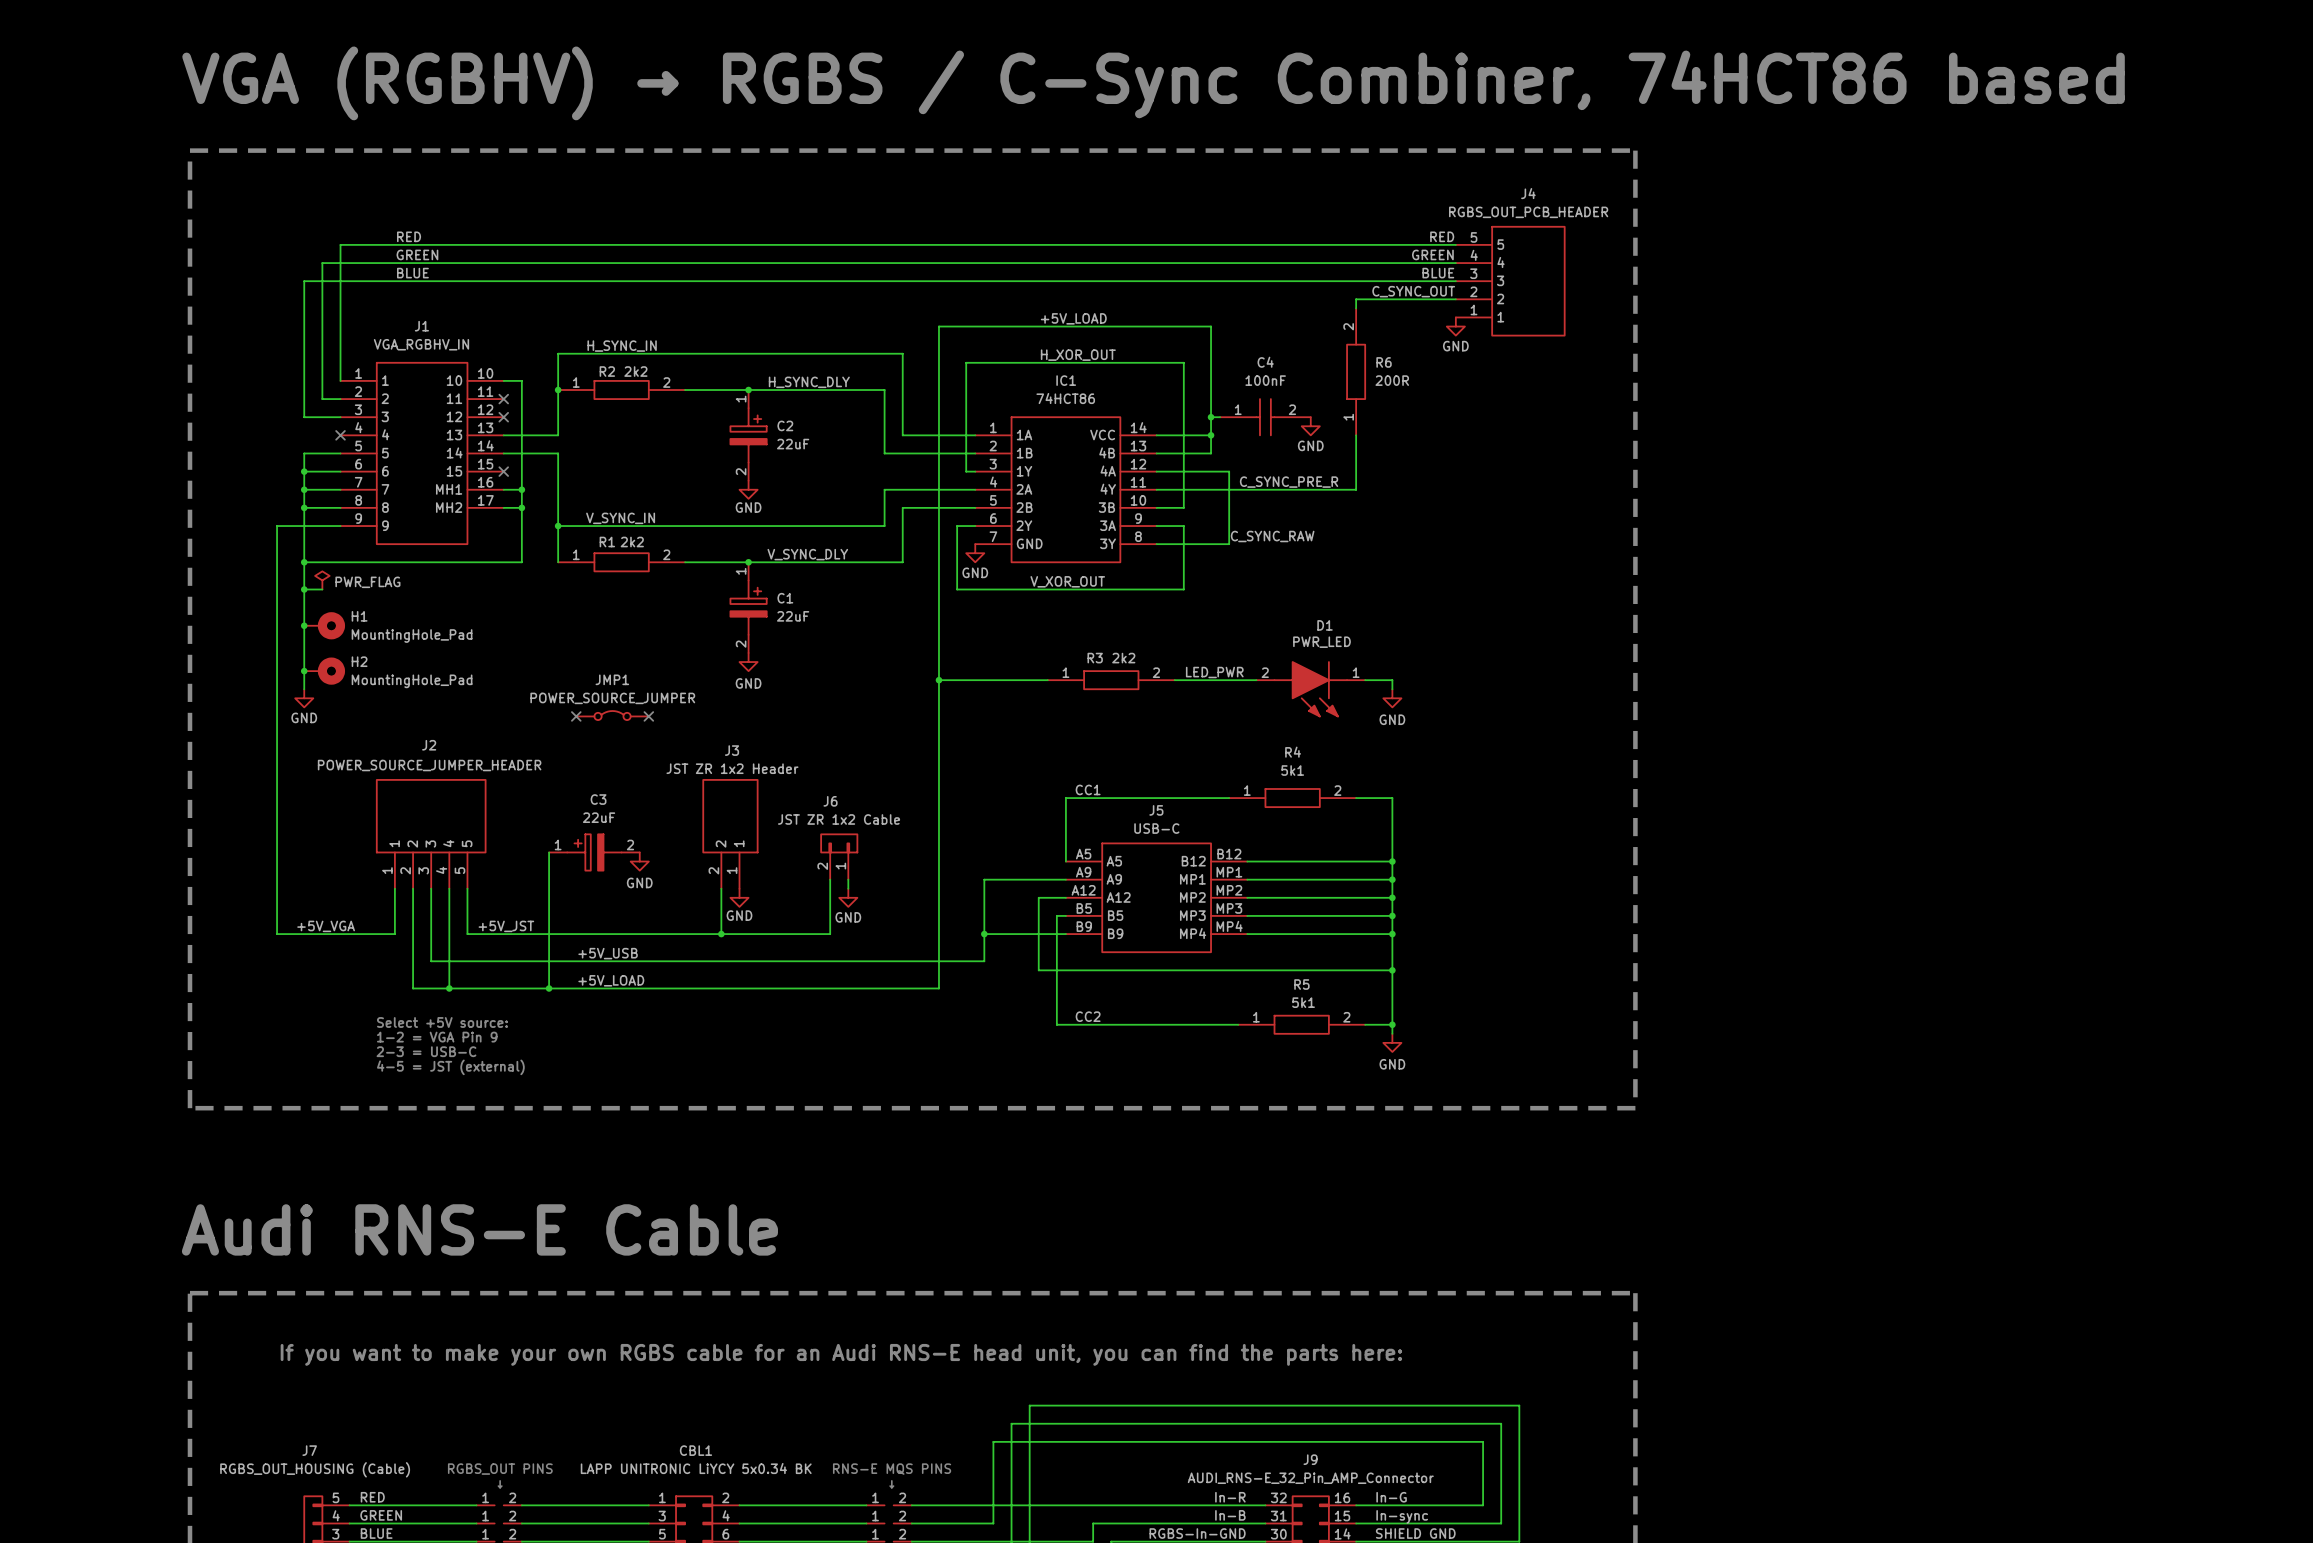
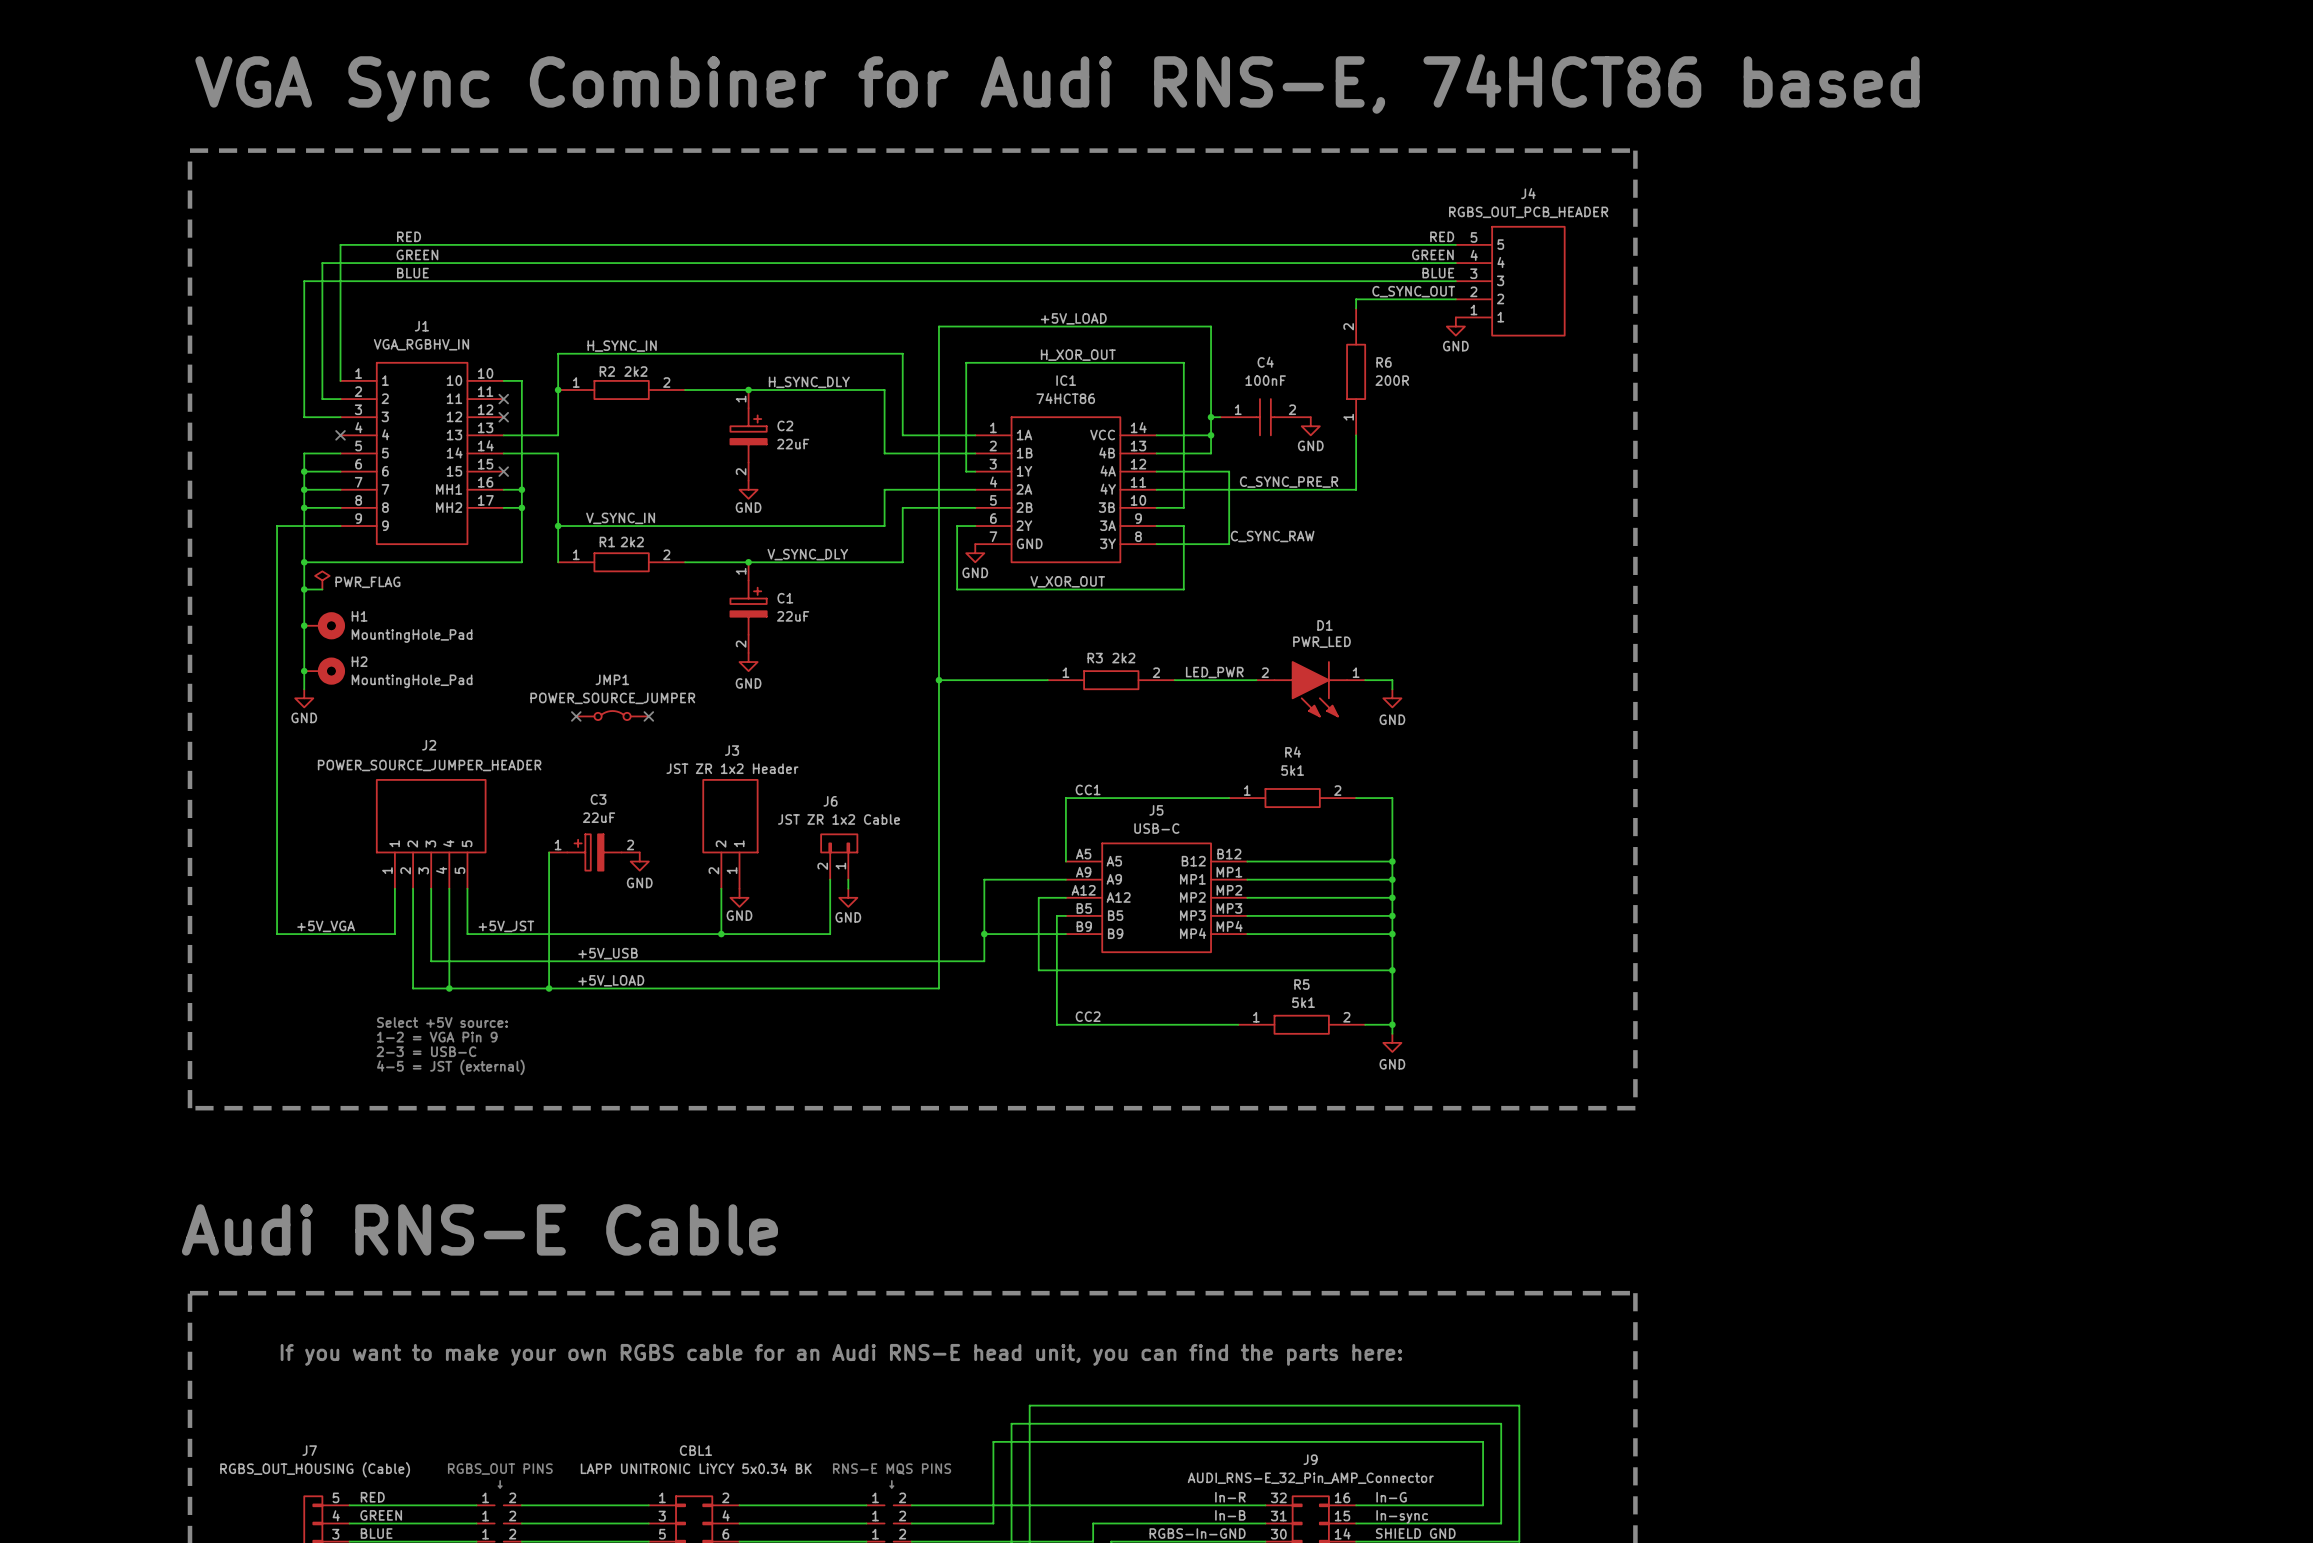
text: VGA (RGBHV) → RGBS / C-Sync Combiner, 74HCT86 based (1153, 83) -> VGA Sync Combiner for Audi RNS-E, 74HCT86 based (1057, 88)

